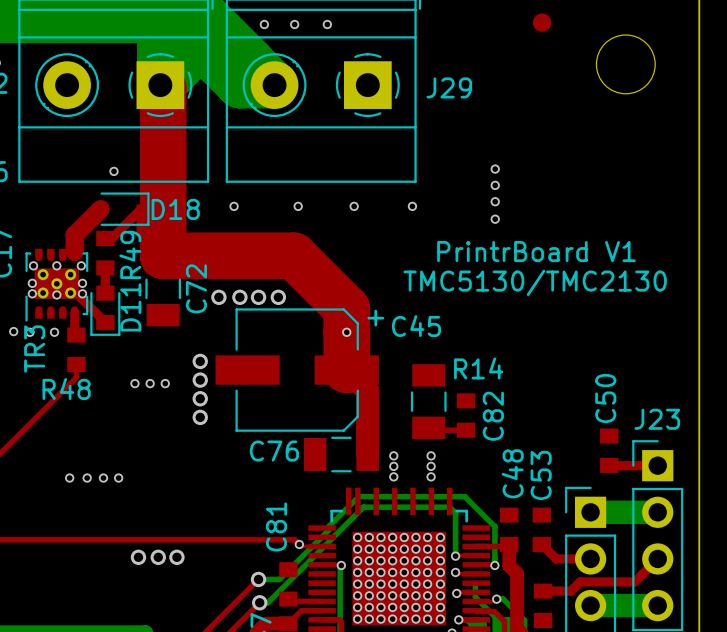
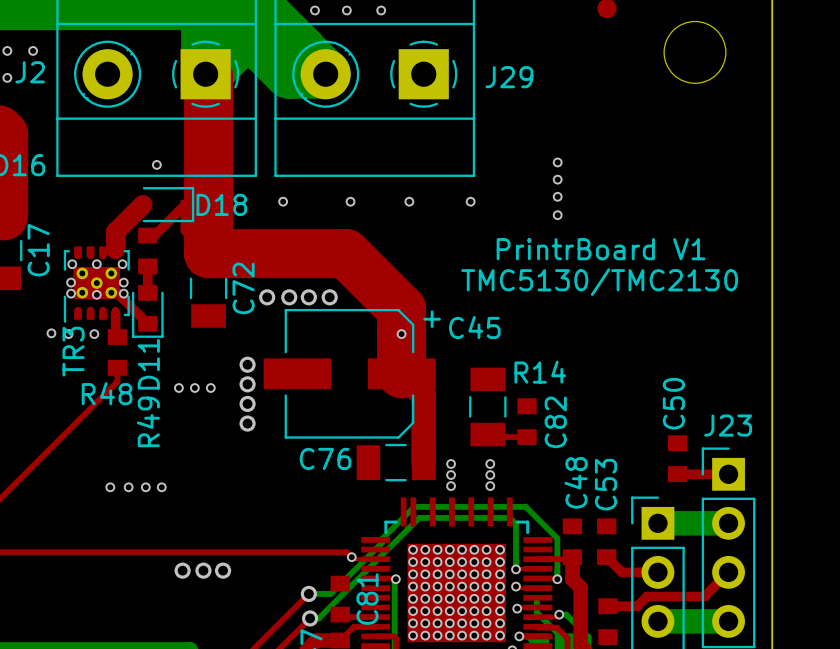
R49 name position: R49 (130, 254) -> R49 (148, 421)
D11 name position: D11 (130, 307) -> D11 (148, 364)
C81 name position: C81 (276, 527) -> C81 (367, 599)

